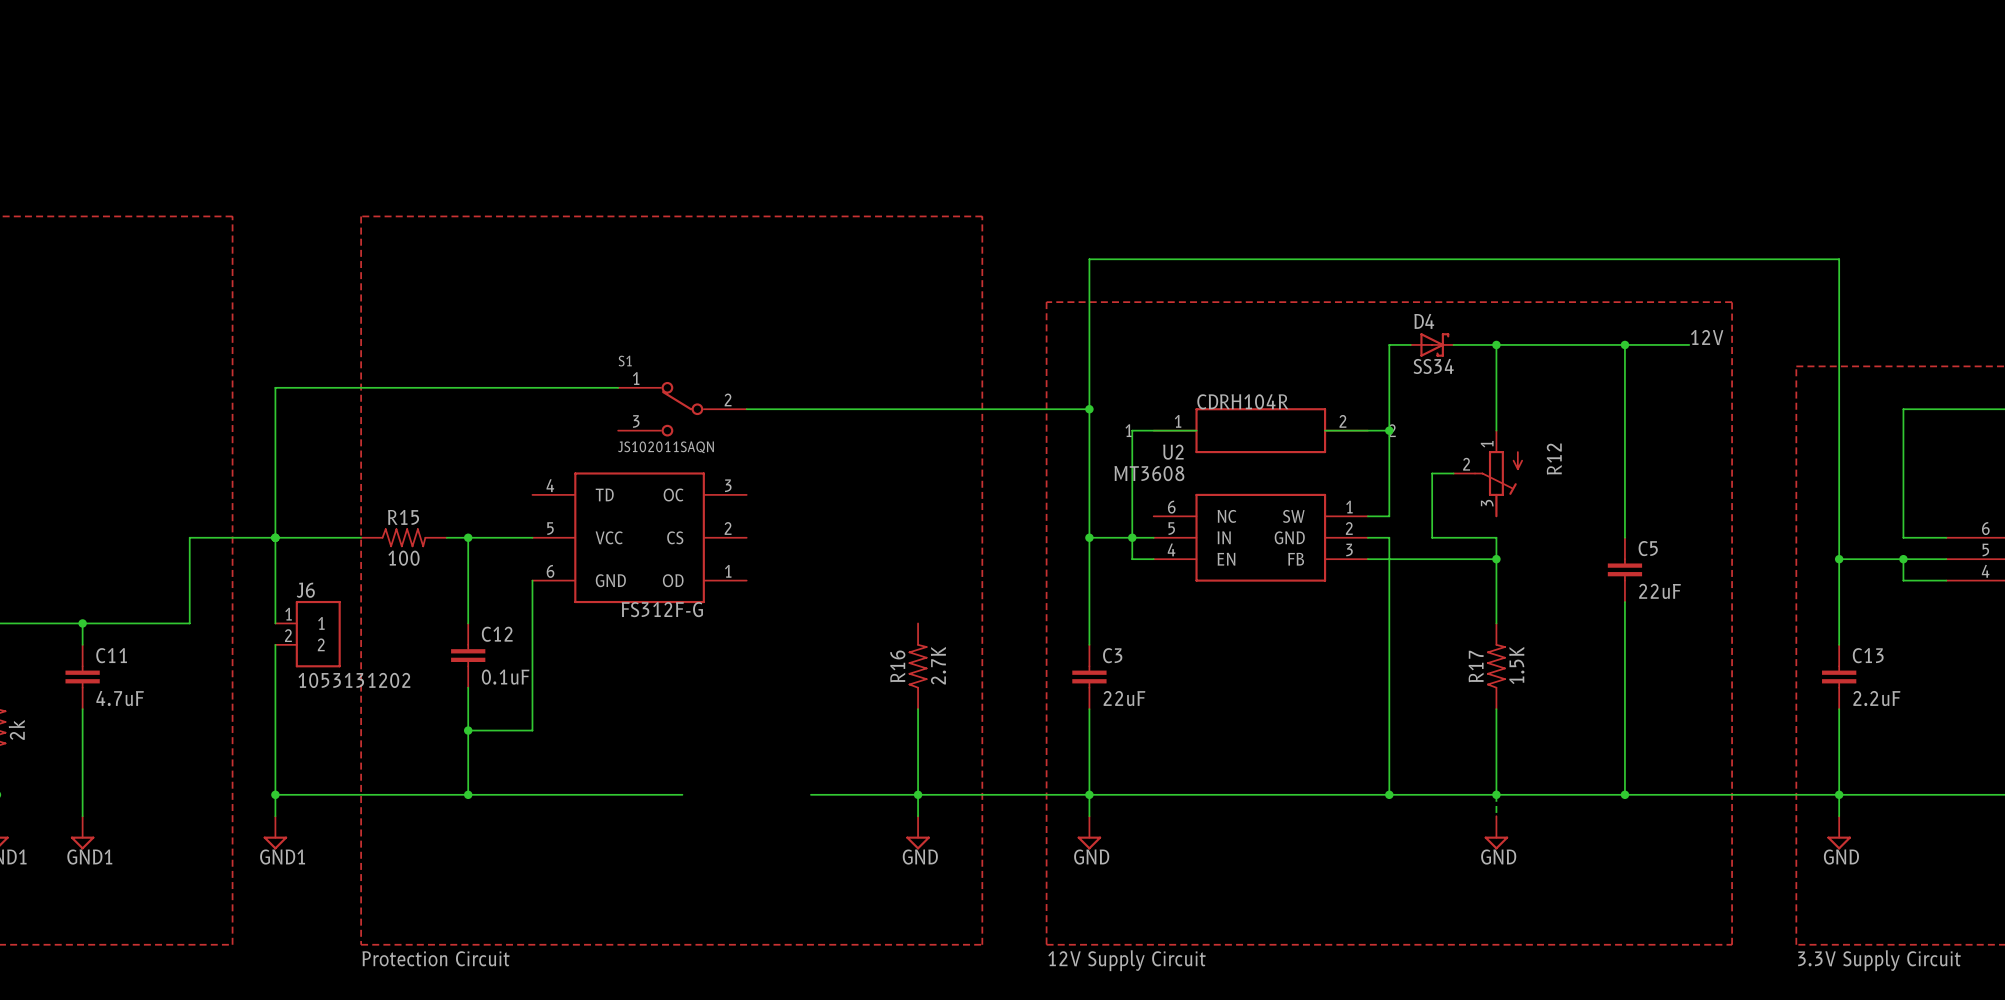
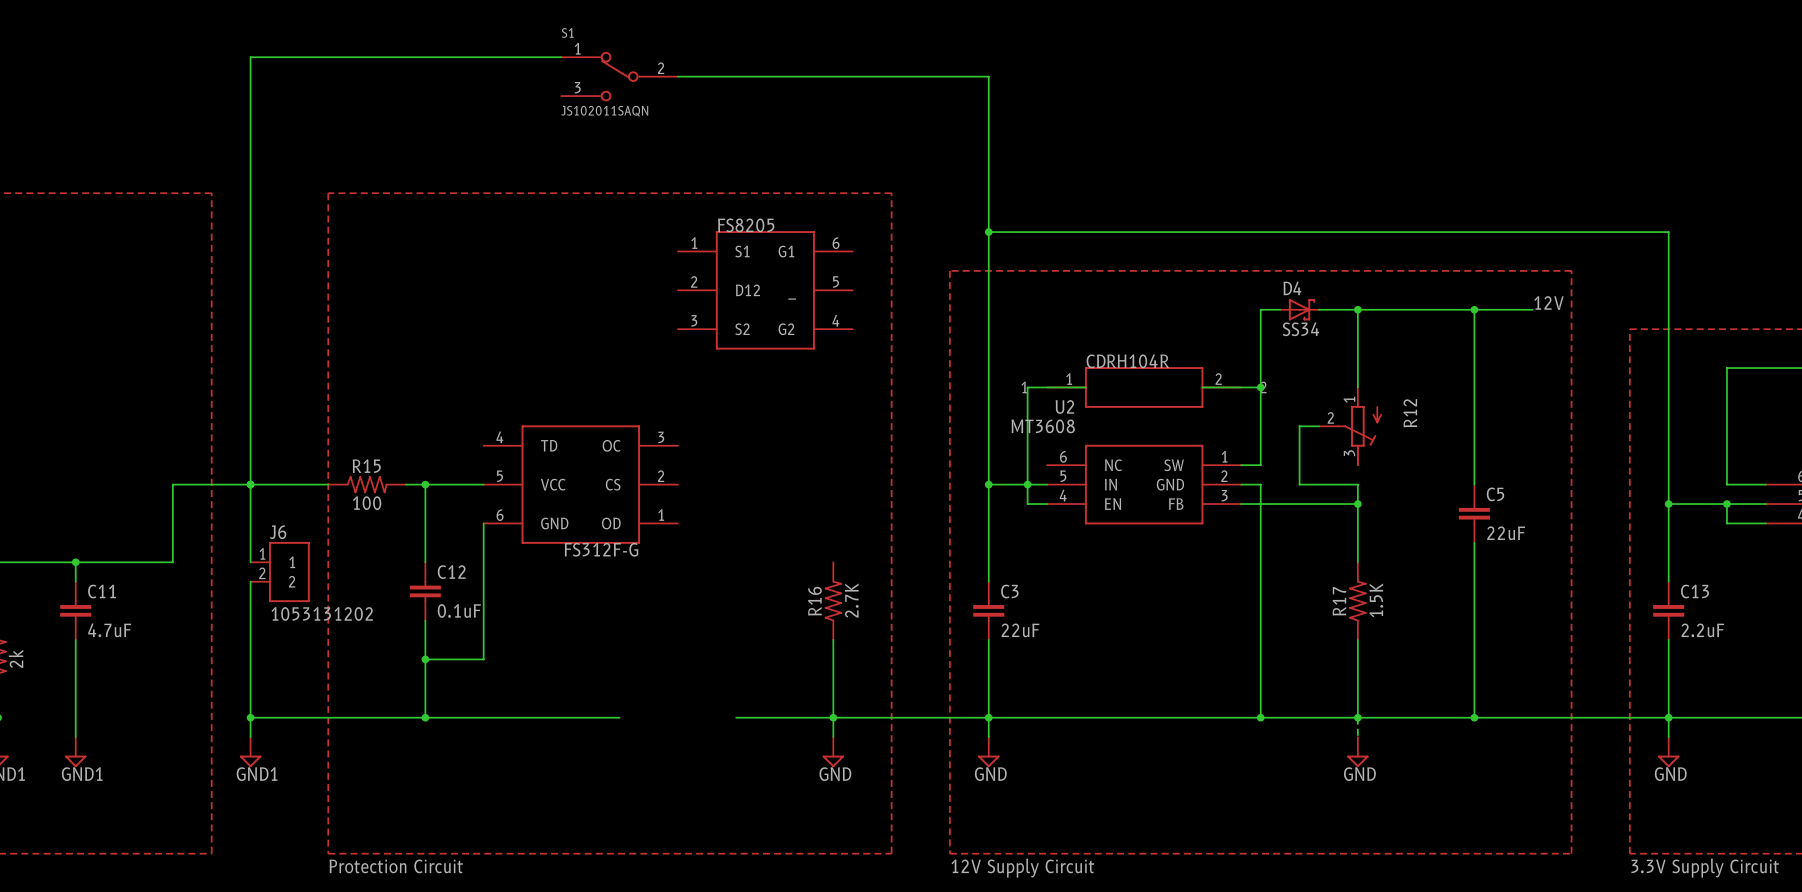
wire: none -> (677, 76) (988, 76) (988, 232)
junction: none -> (988, 232)
part: none -> (765, 290)
wire: (275, 387) (618, 387) -> (250, 348) (250, 57) (561, 57)
S1 position: (682, 409) -> (619, 76)
wire: (746, 409) (1089, 409) -> none
junction: (1089, 409) -> none

